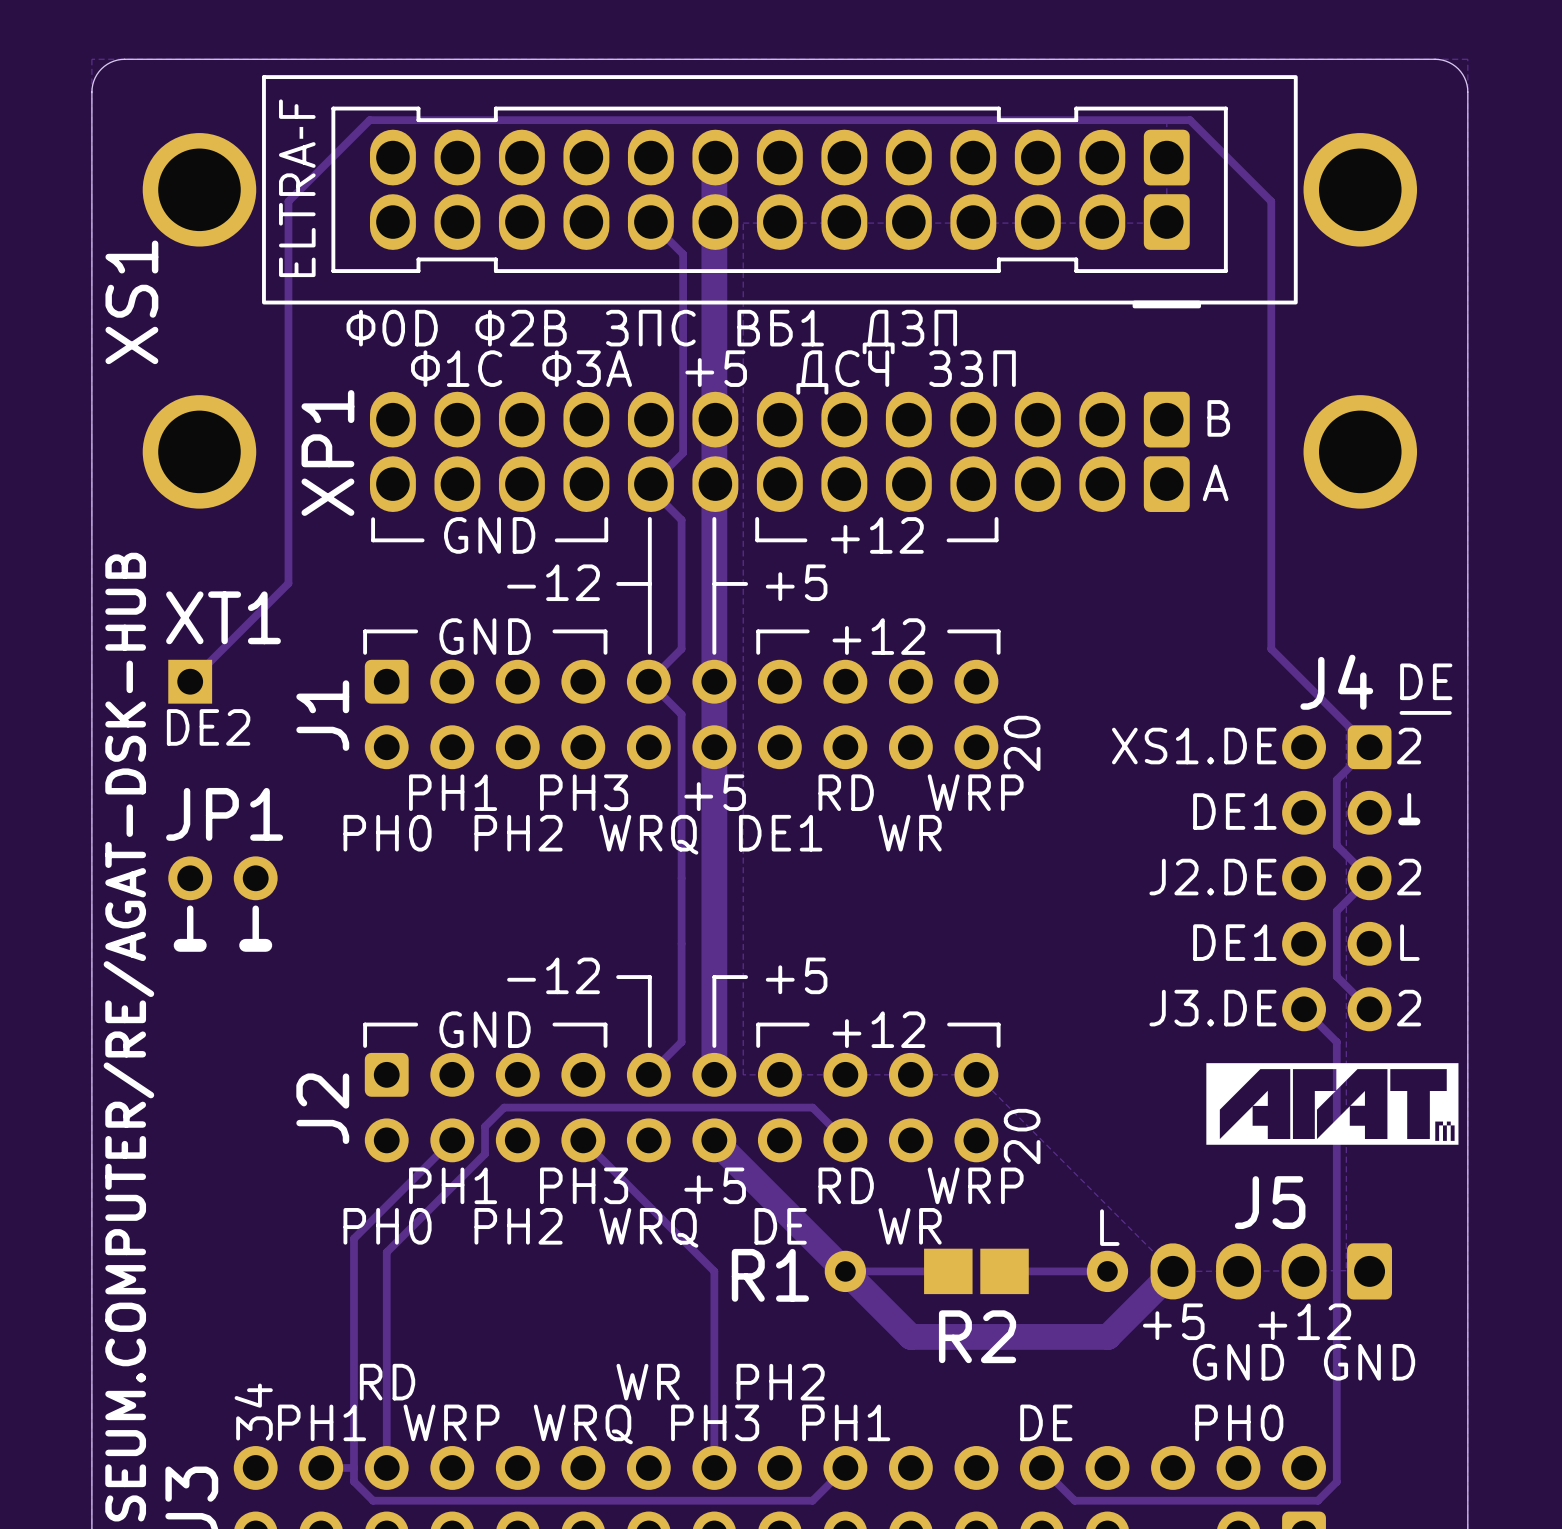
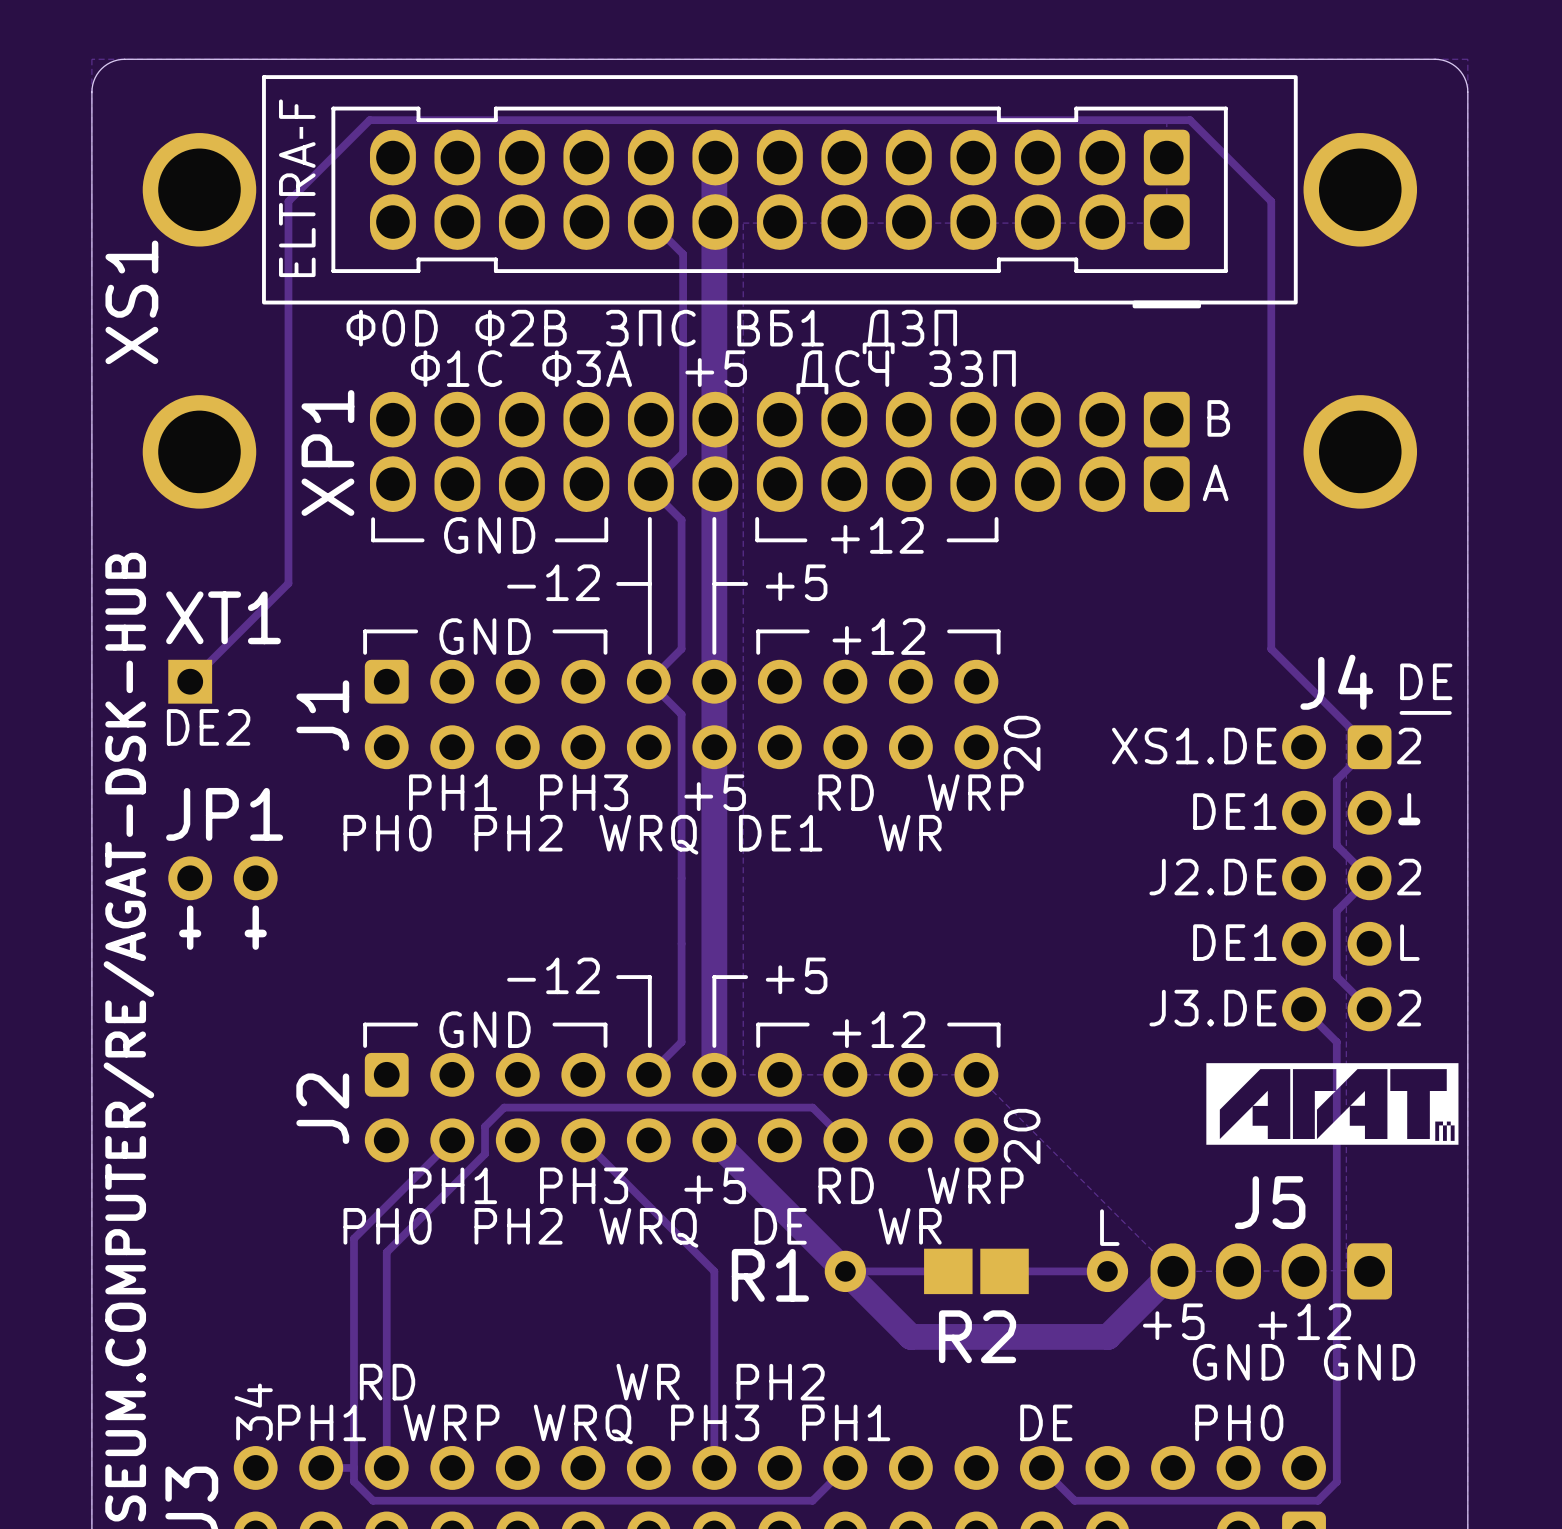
line: none -> (197, 933) (182, 933)
line: none -> (262, 933) (248, 933)
line: (200, 945) (180, 945) -> none
line: (265, 945) (245, 945) -> none

